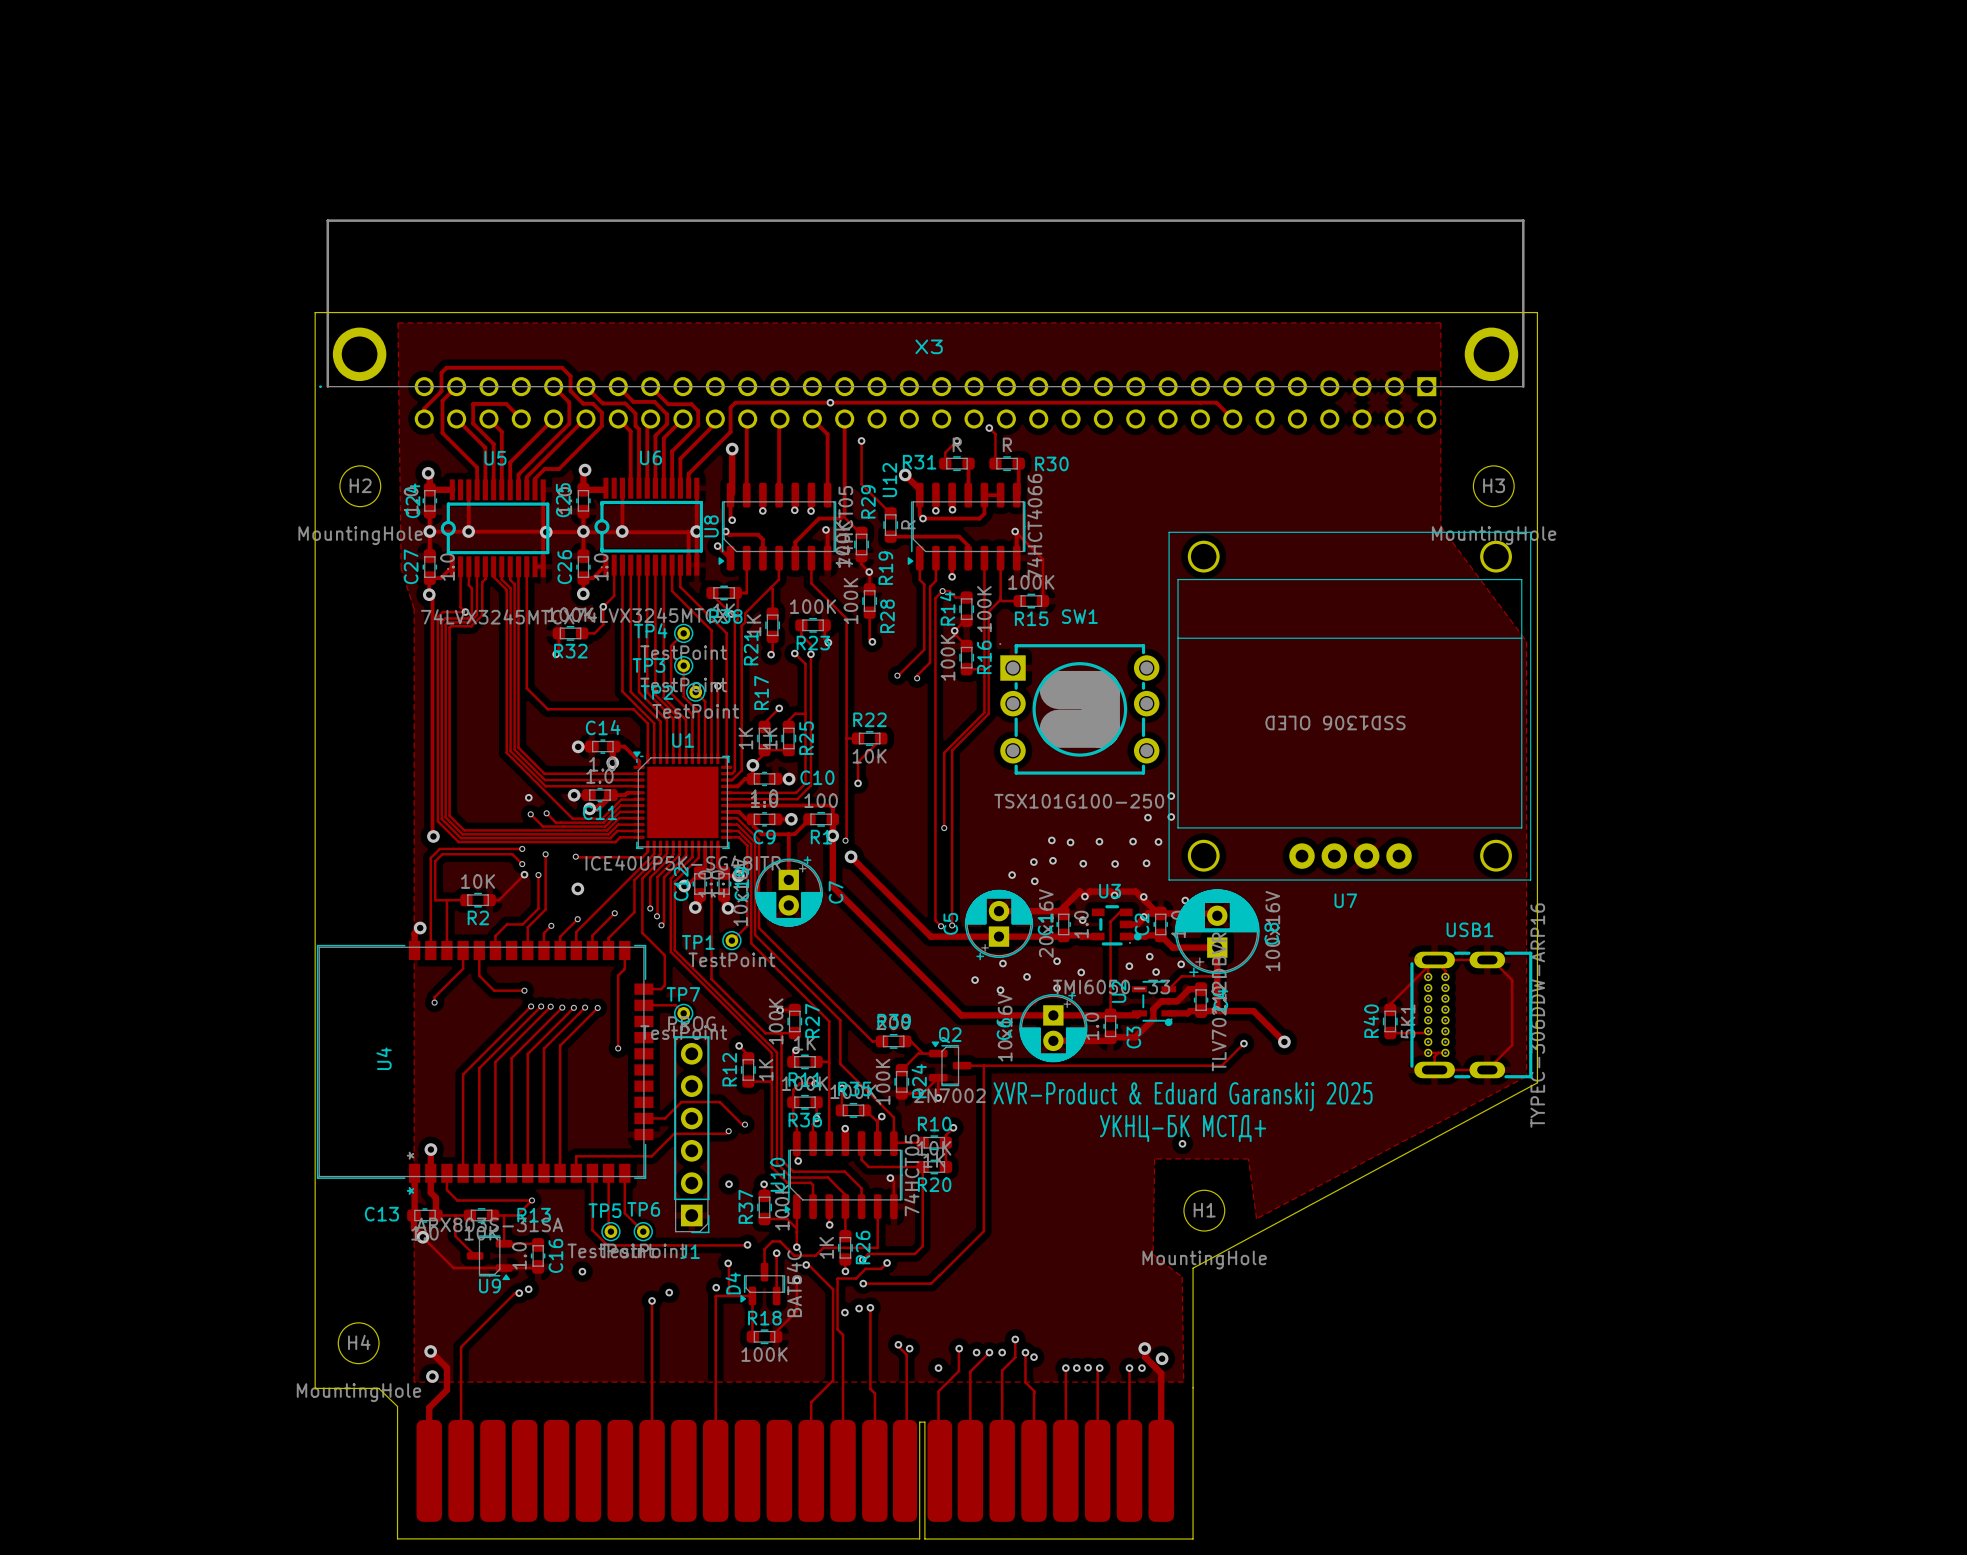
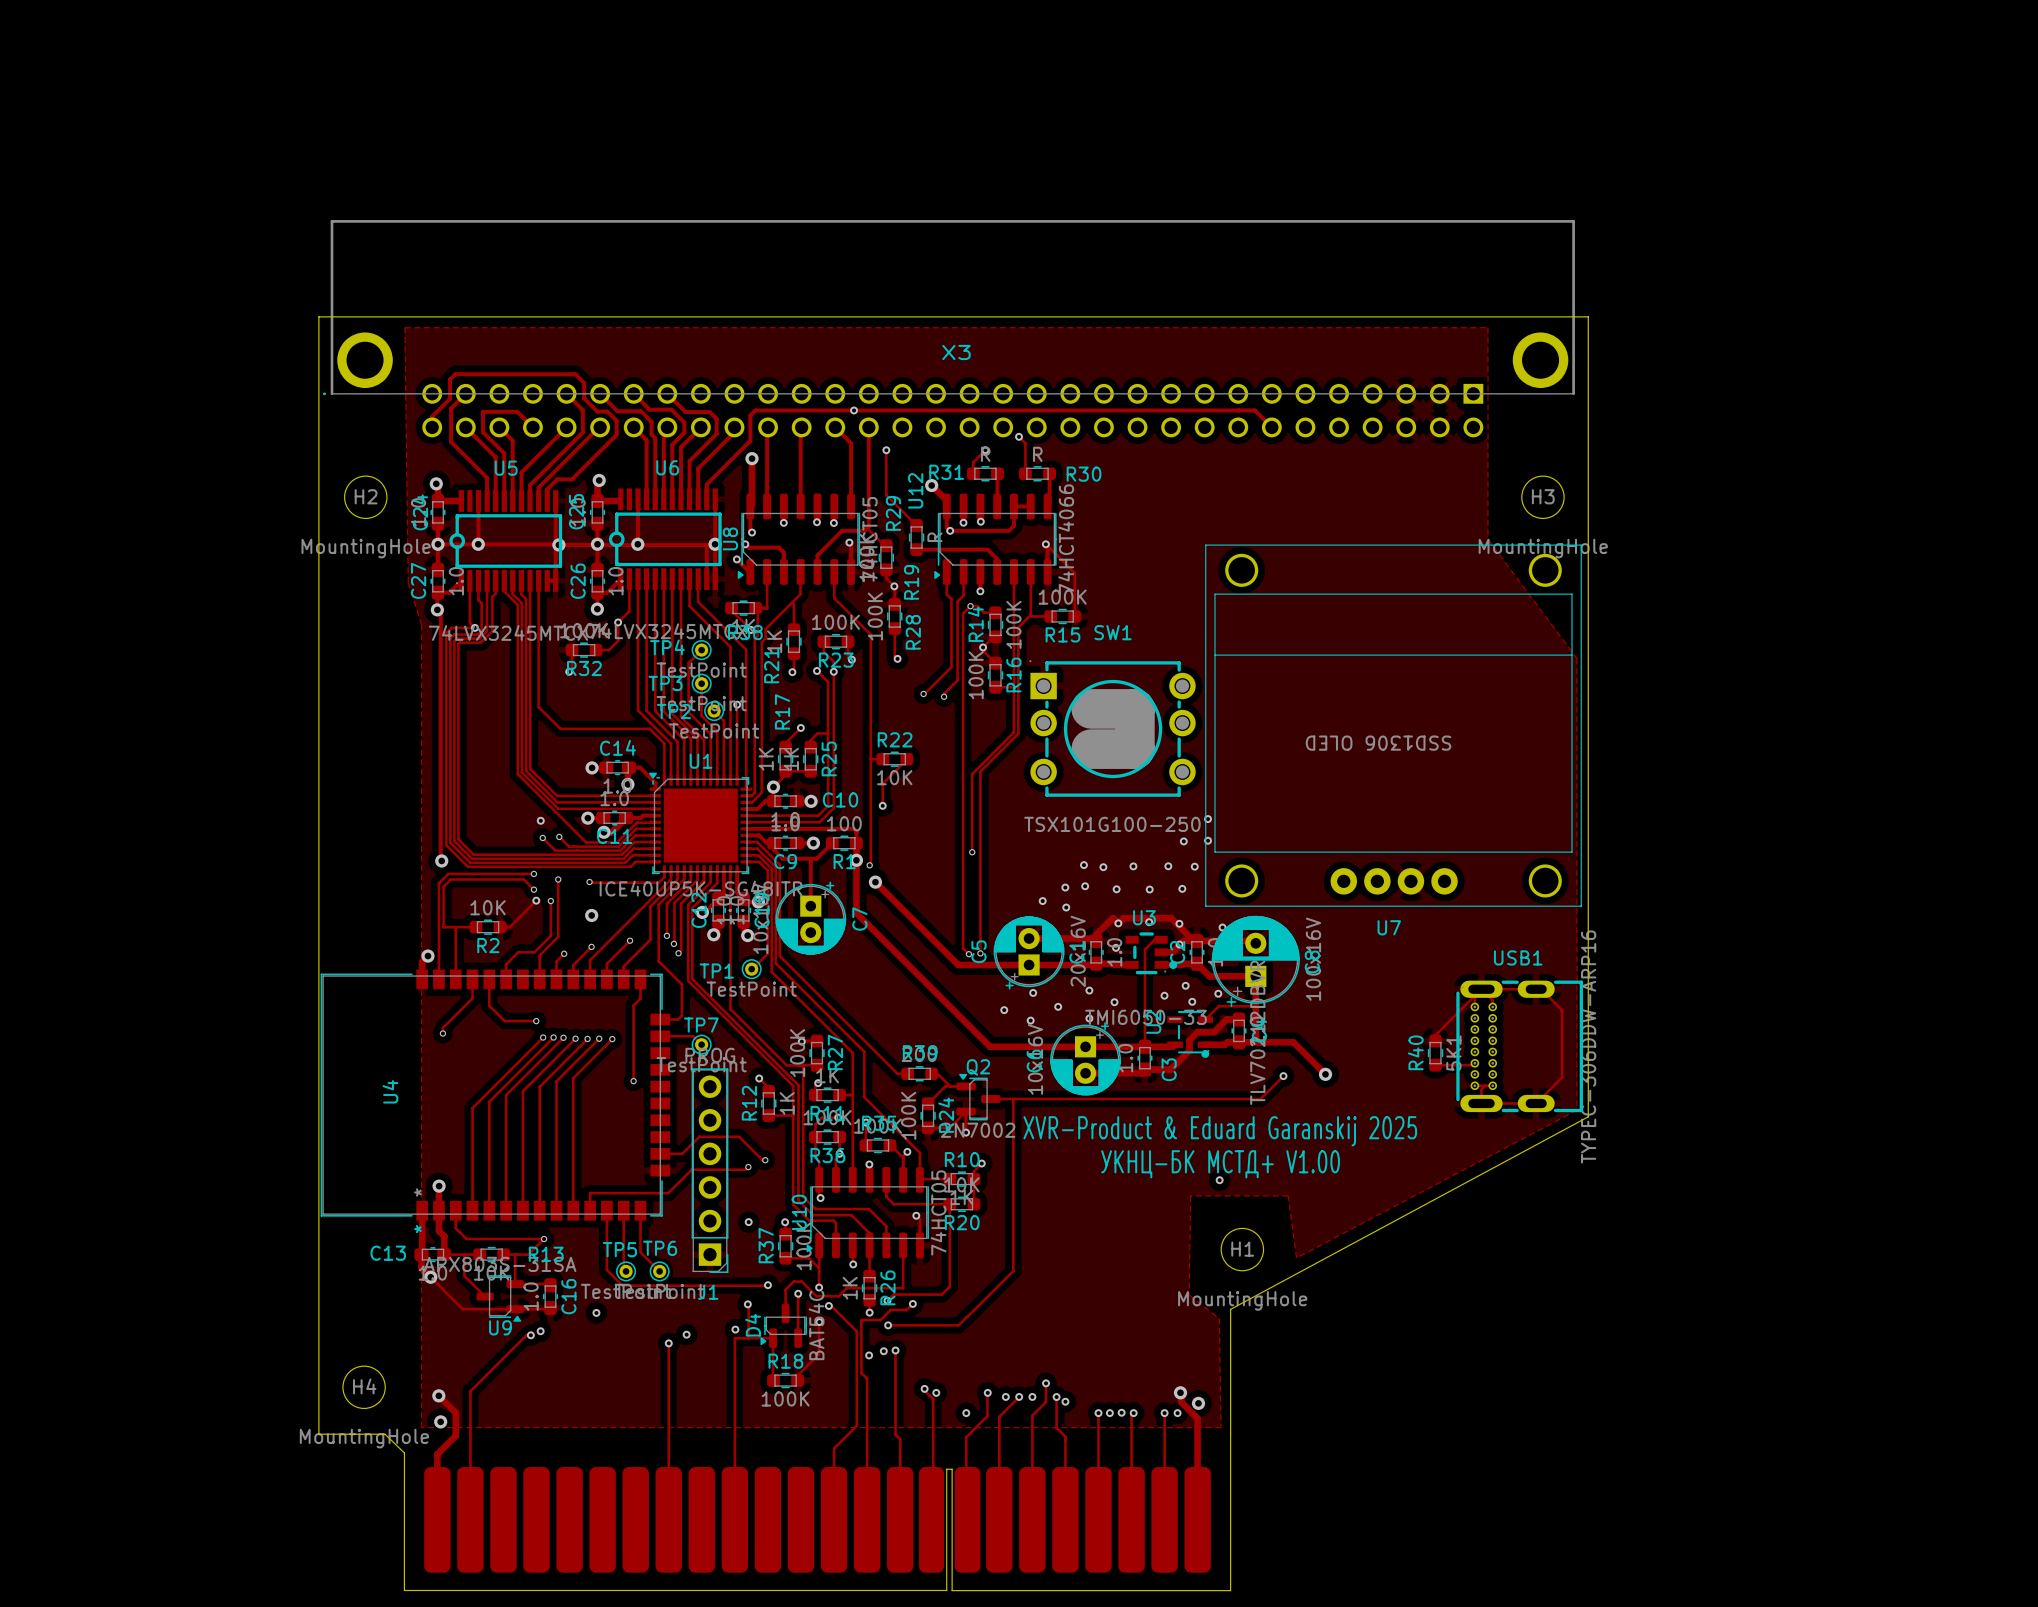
text: УКНЦ-БК МСТД+ (1183, 1128) -> УКНЦ-БК МСТД+ V1.00 (1220, 1164)

